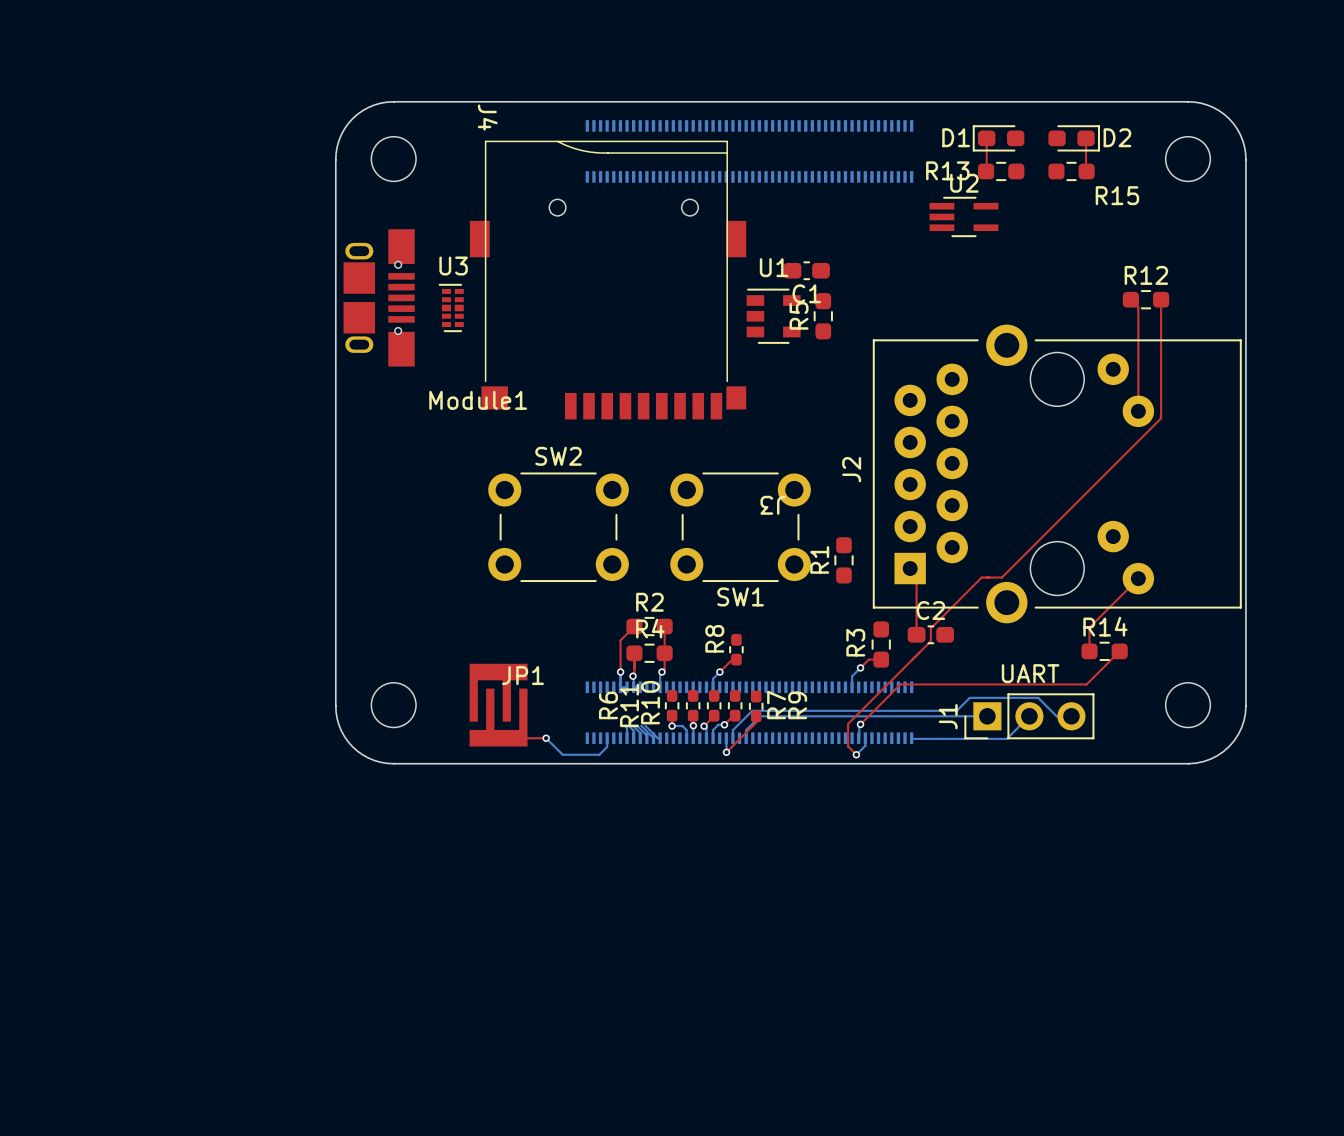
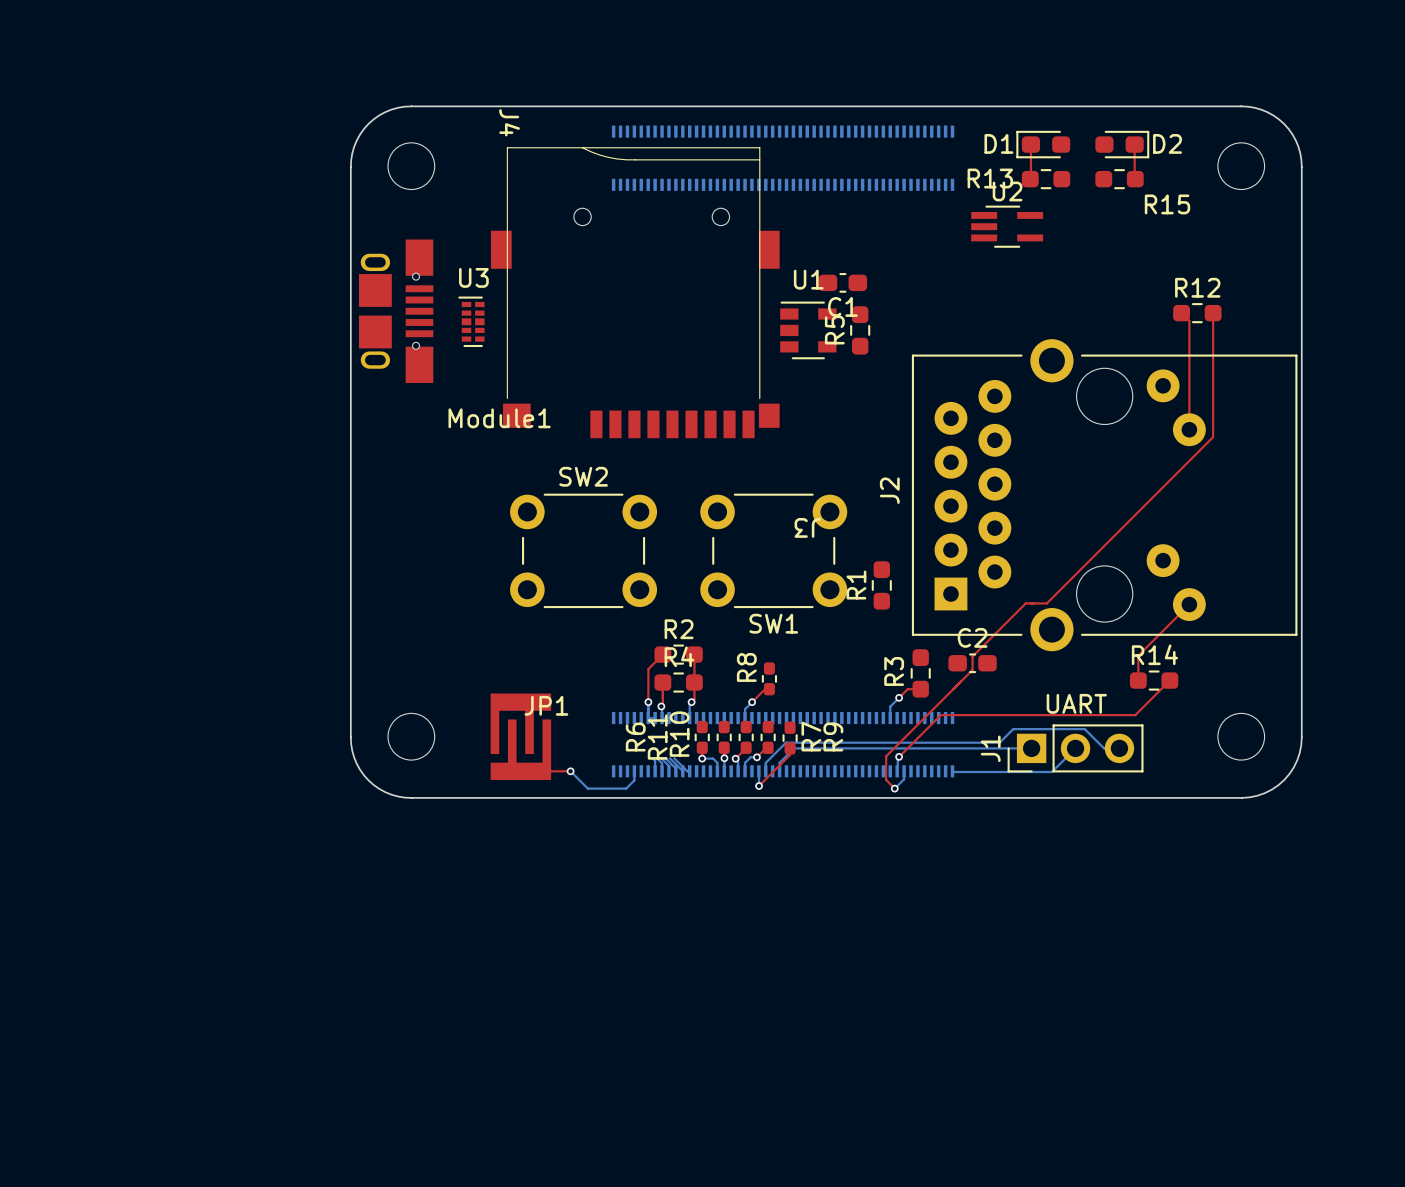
top track: (910, 568) (916, 574) (916, 634) -> none

